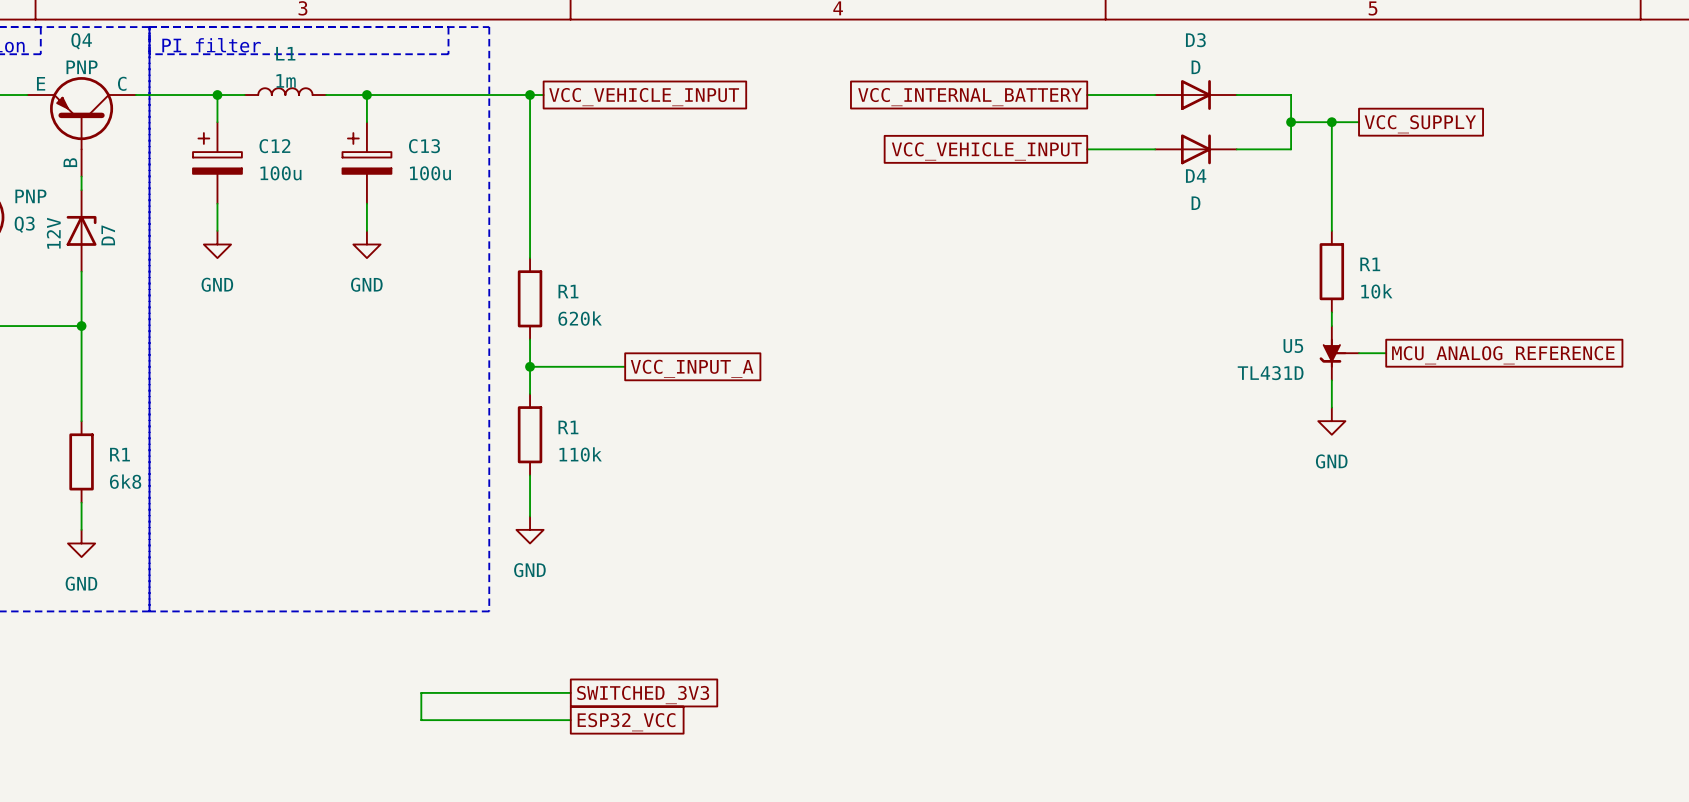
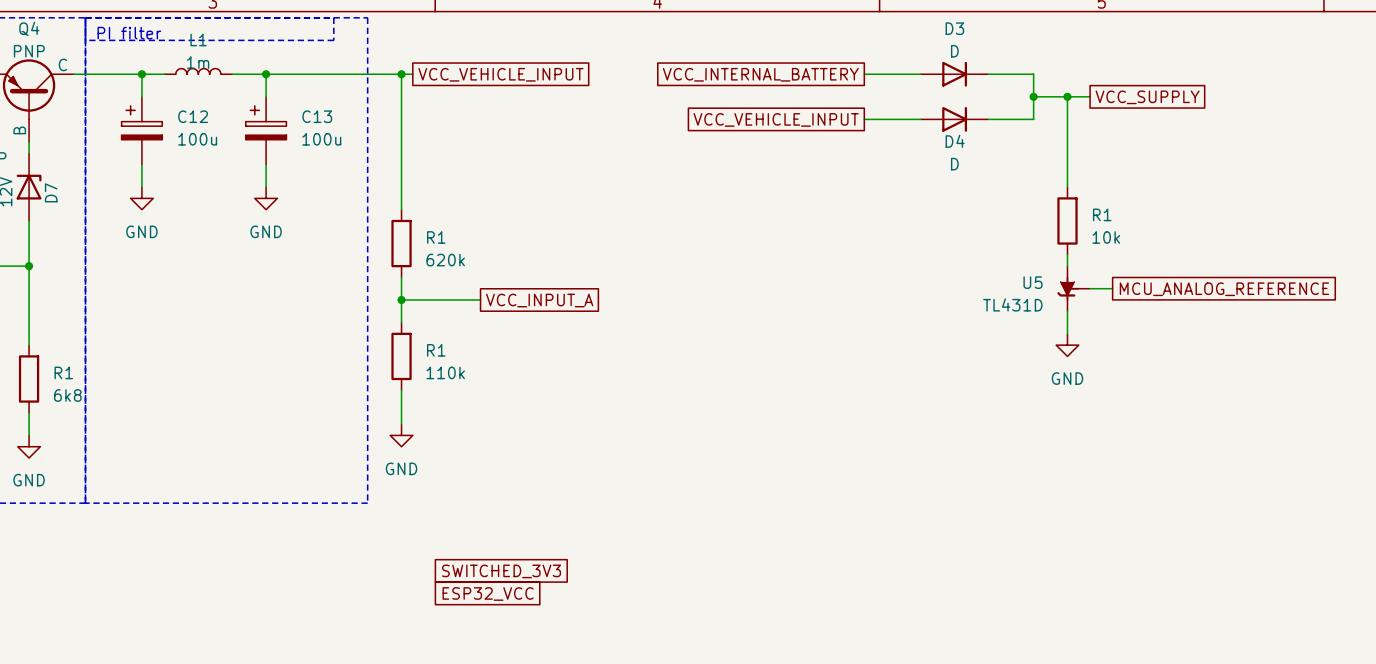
wire: (570, 692) (421, 692) (421, 720) (570, 720) -> none

